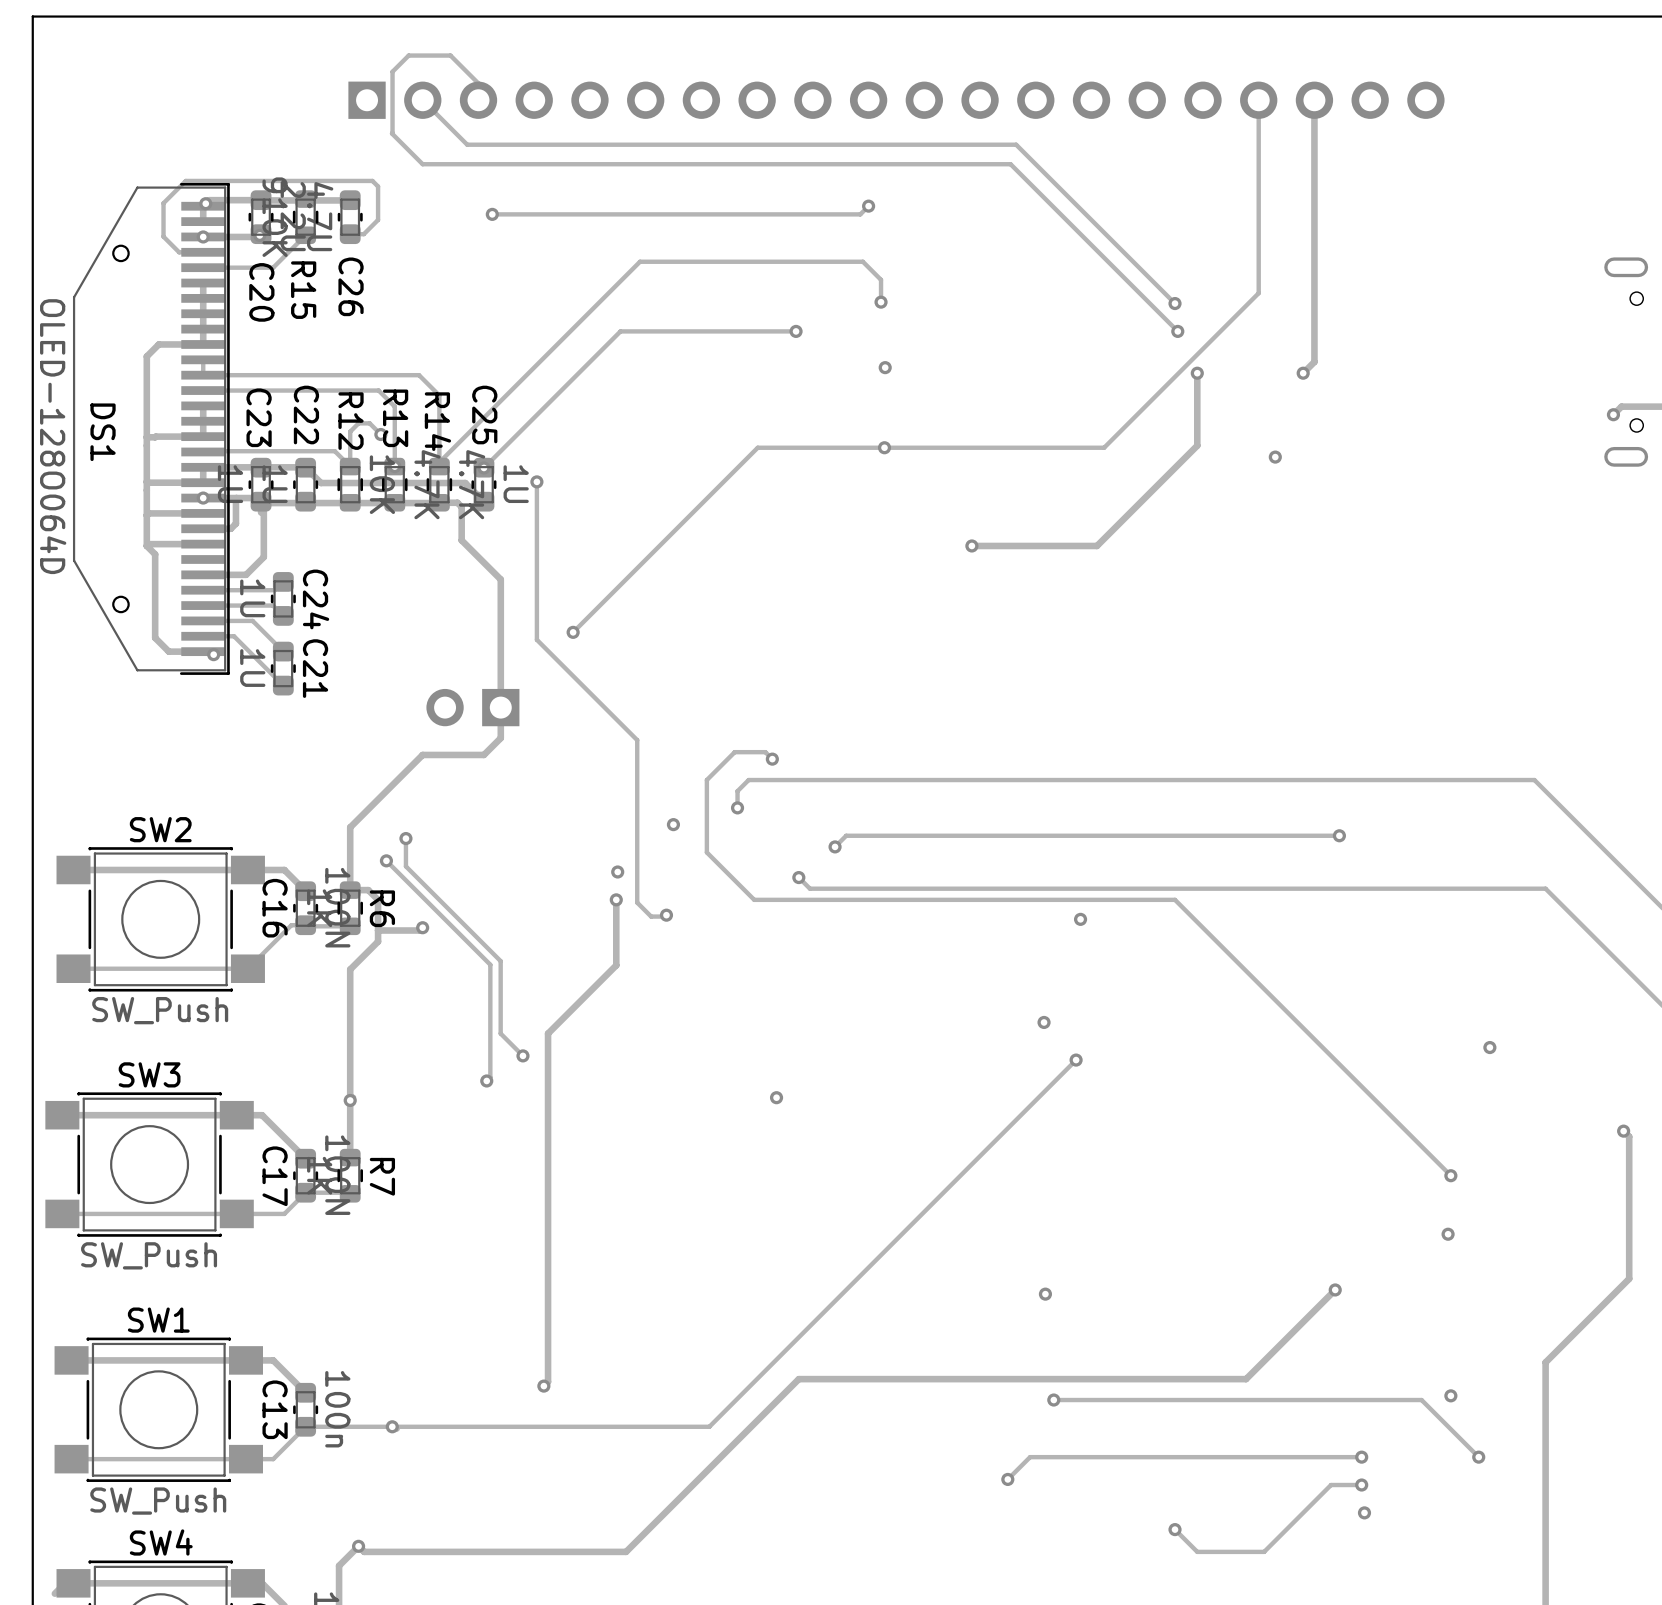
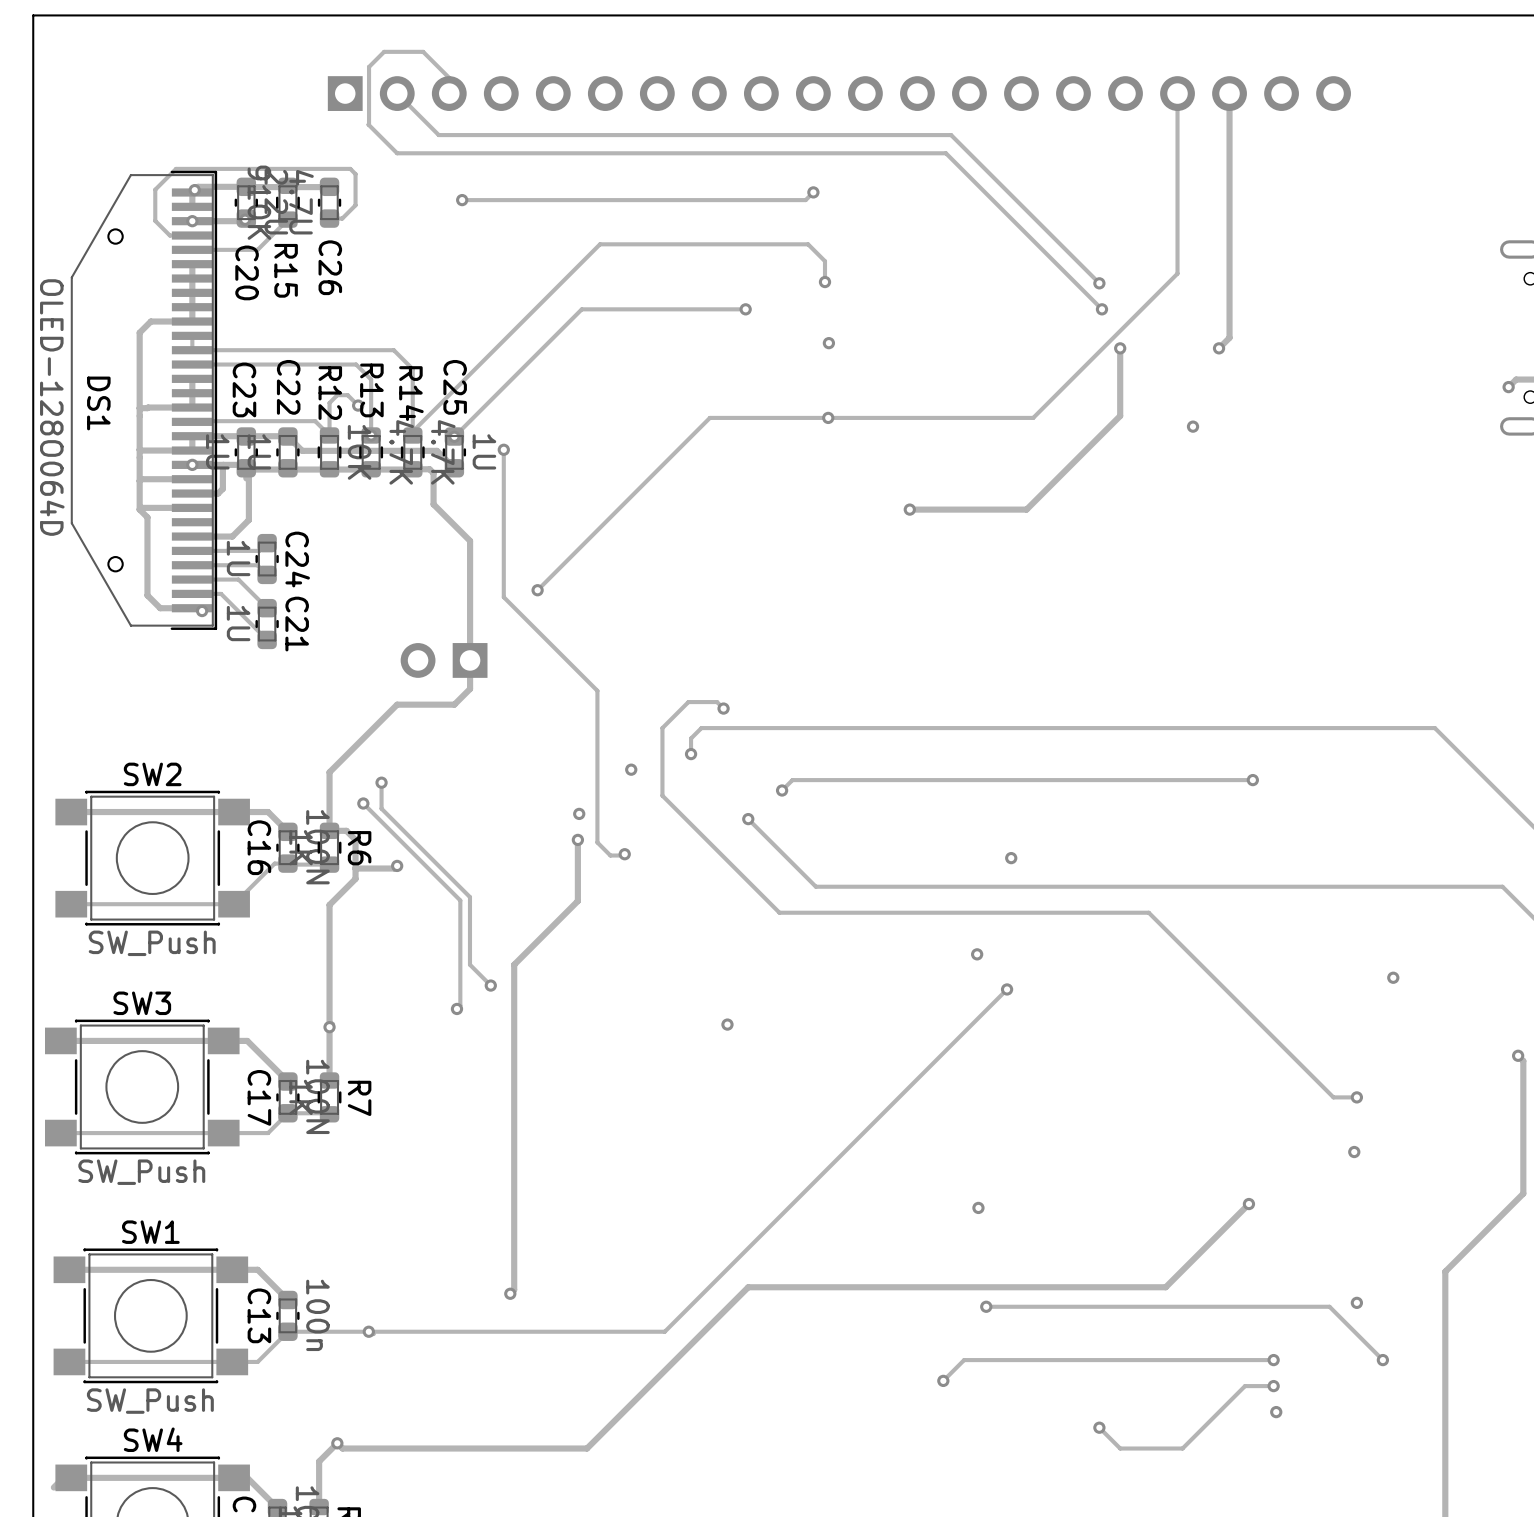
track: (809, 888) (1545, 888) (1606, 950) -> (758, 829) (815, 886) (1502, 886)
track: (754, 899) (1175, 899) (1450, 1175) -> (706, 839) (779, 912) (1148, 912) (1333, 1097) (1356, 1097)

